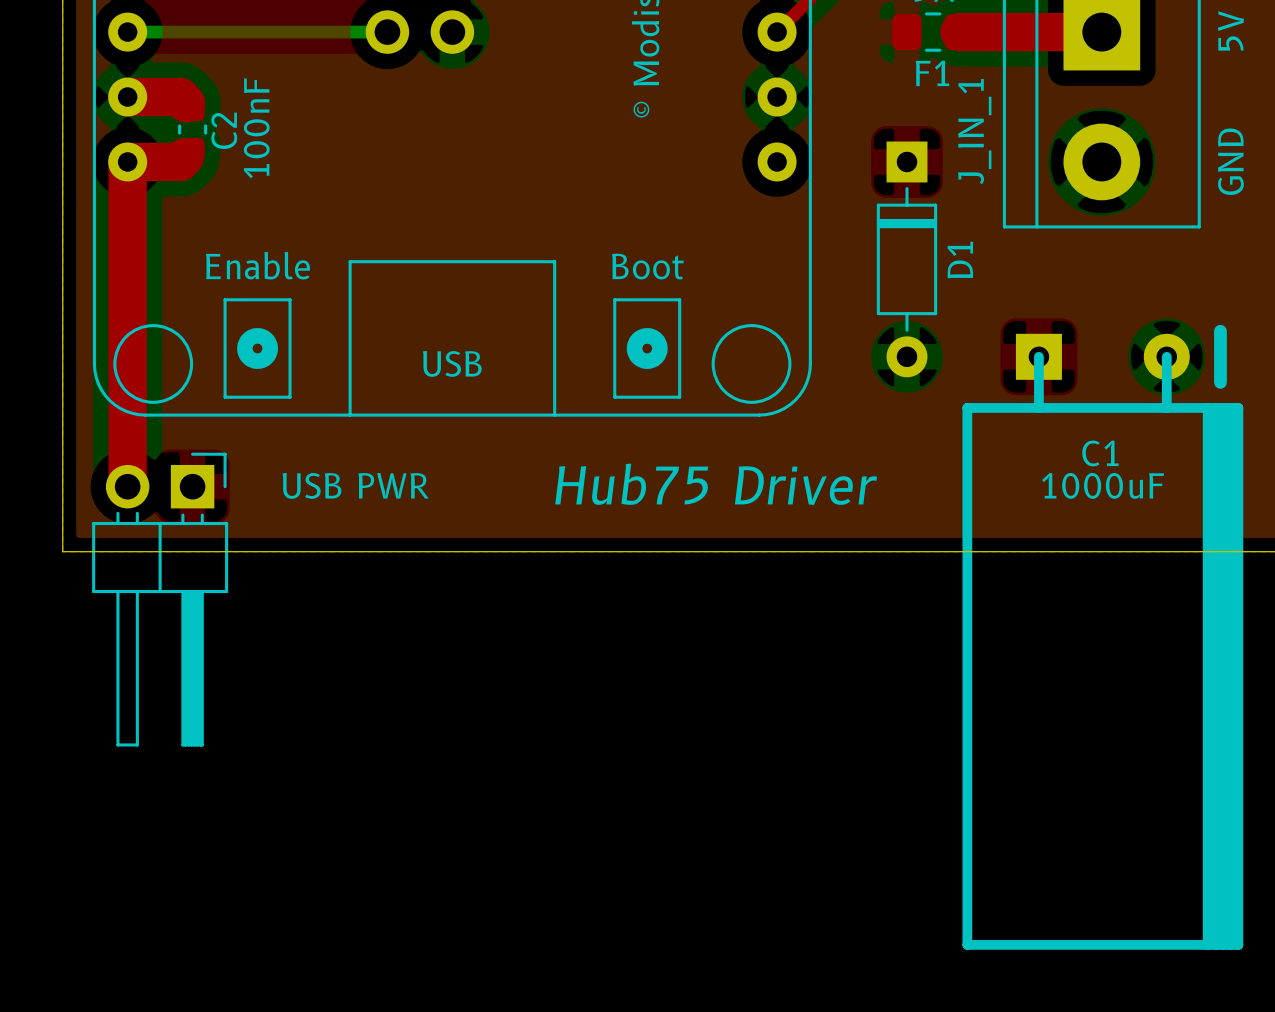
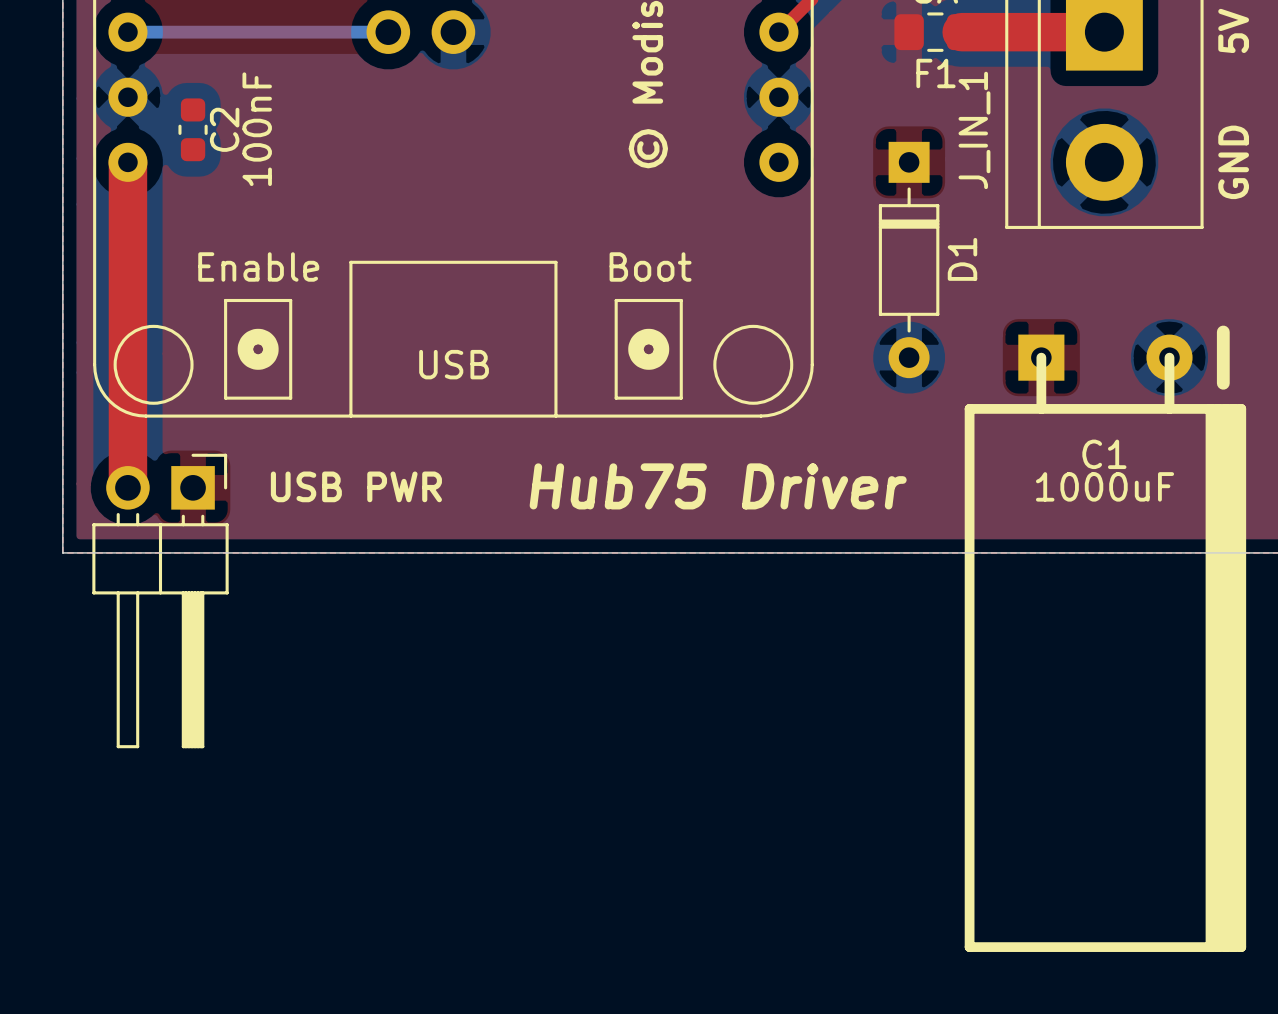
top track: (127, 97) (179, 97) (186, 103) -> none
top track: (184, 156) (179, 161) (127, 161) -> none

